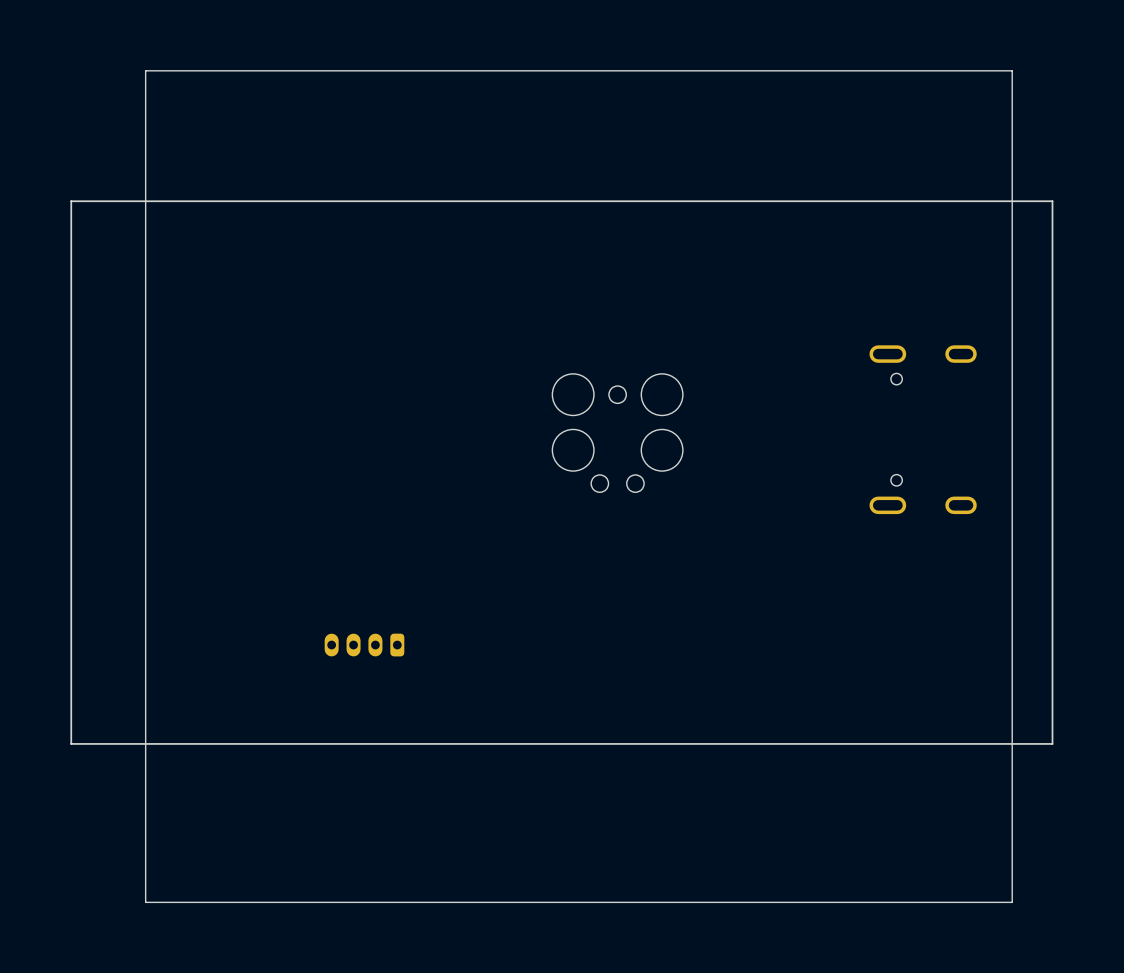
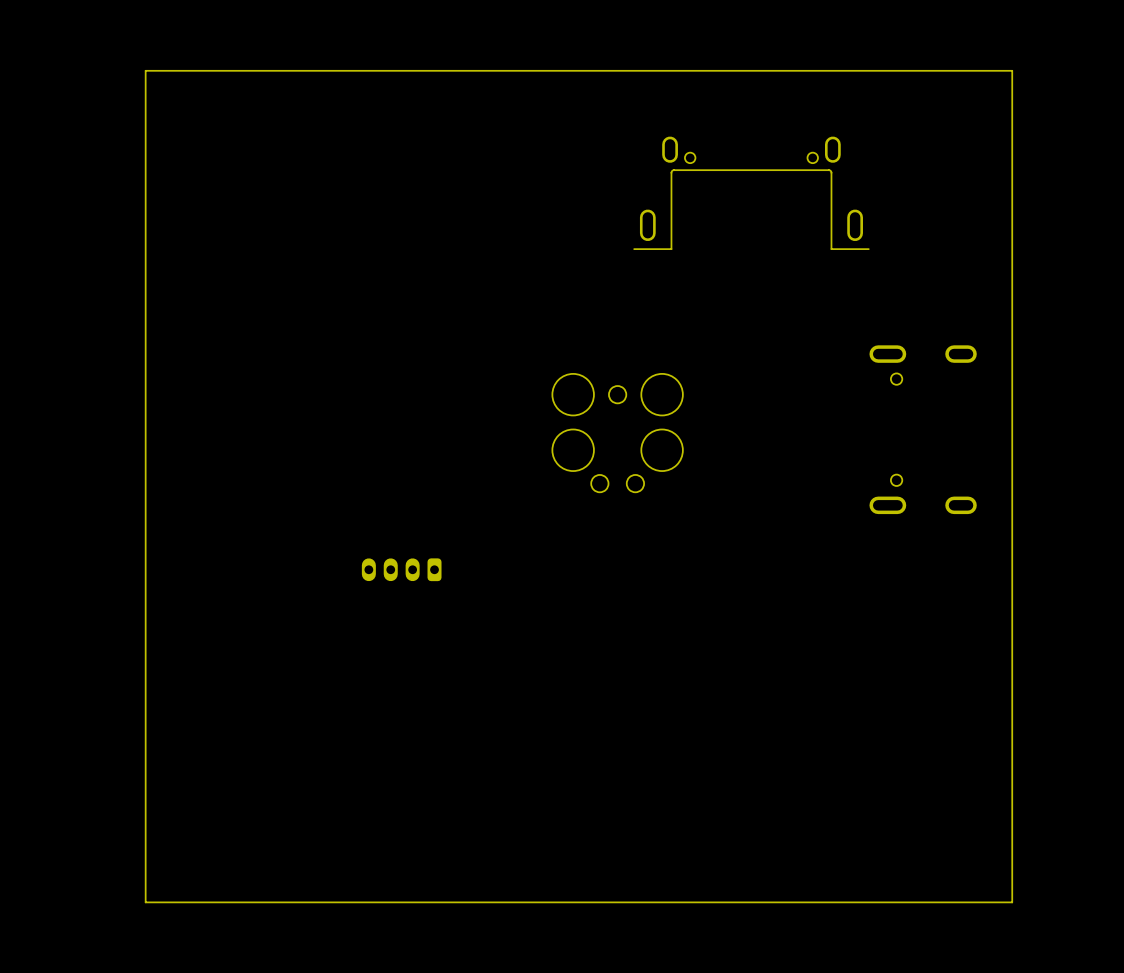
part: none -> (751, 193)
board edge: (1052, 201) (71, 201) (71, 743) (1052, 743) (1052, 201) -> none
part position: (364, 645) -> (401, 569)

